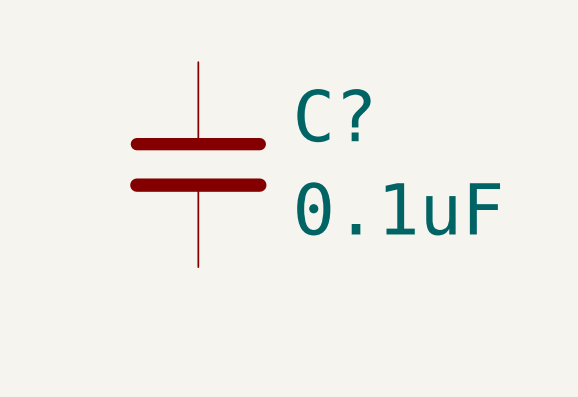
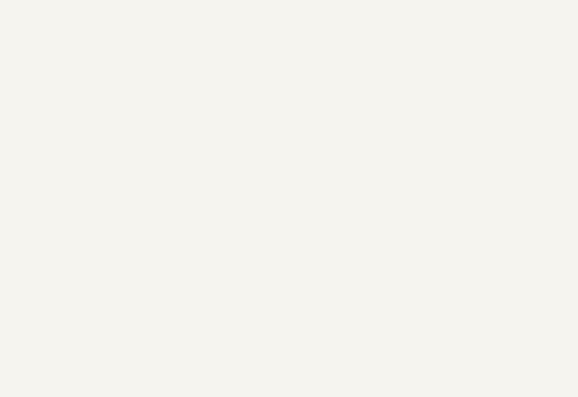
C?: 0.1uF (198, 164) -> none

